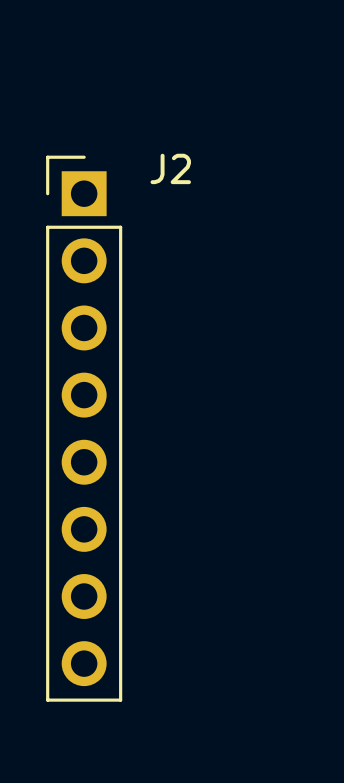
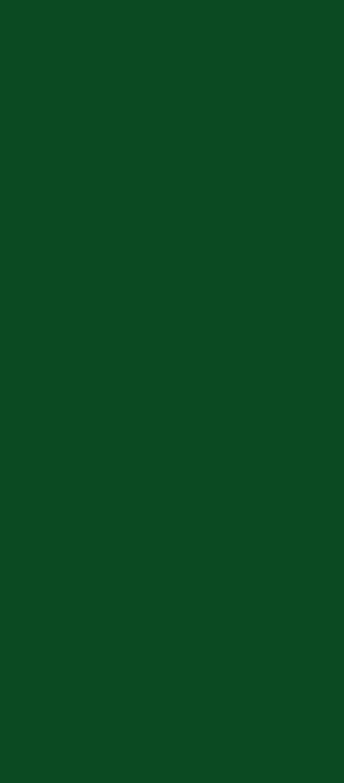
J2: (84, 428) -> none

